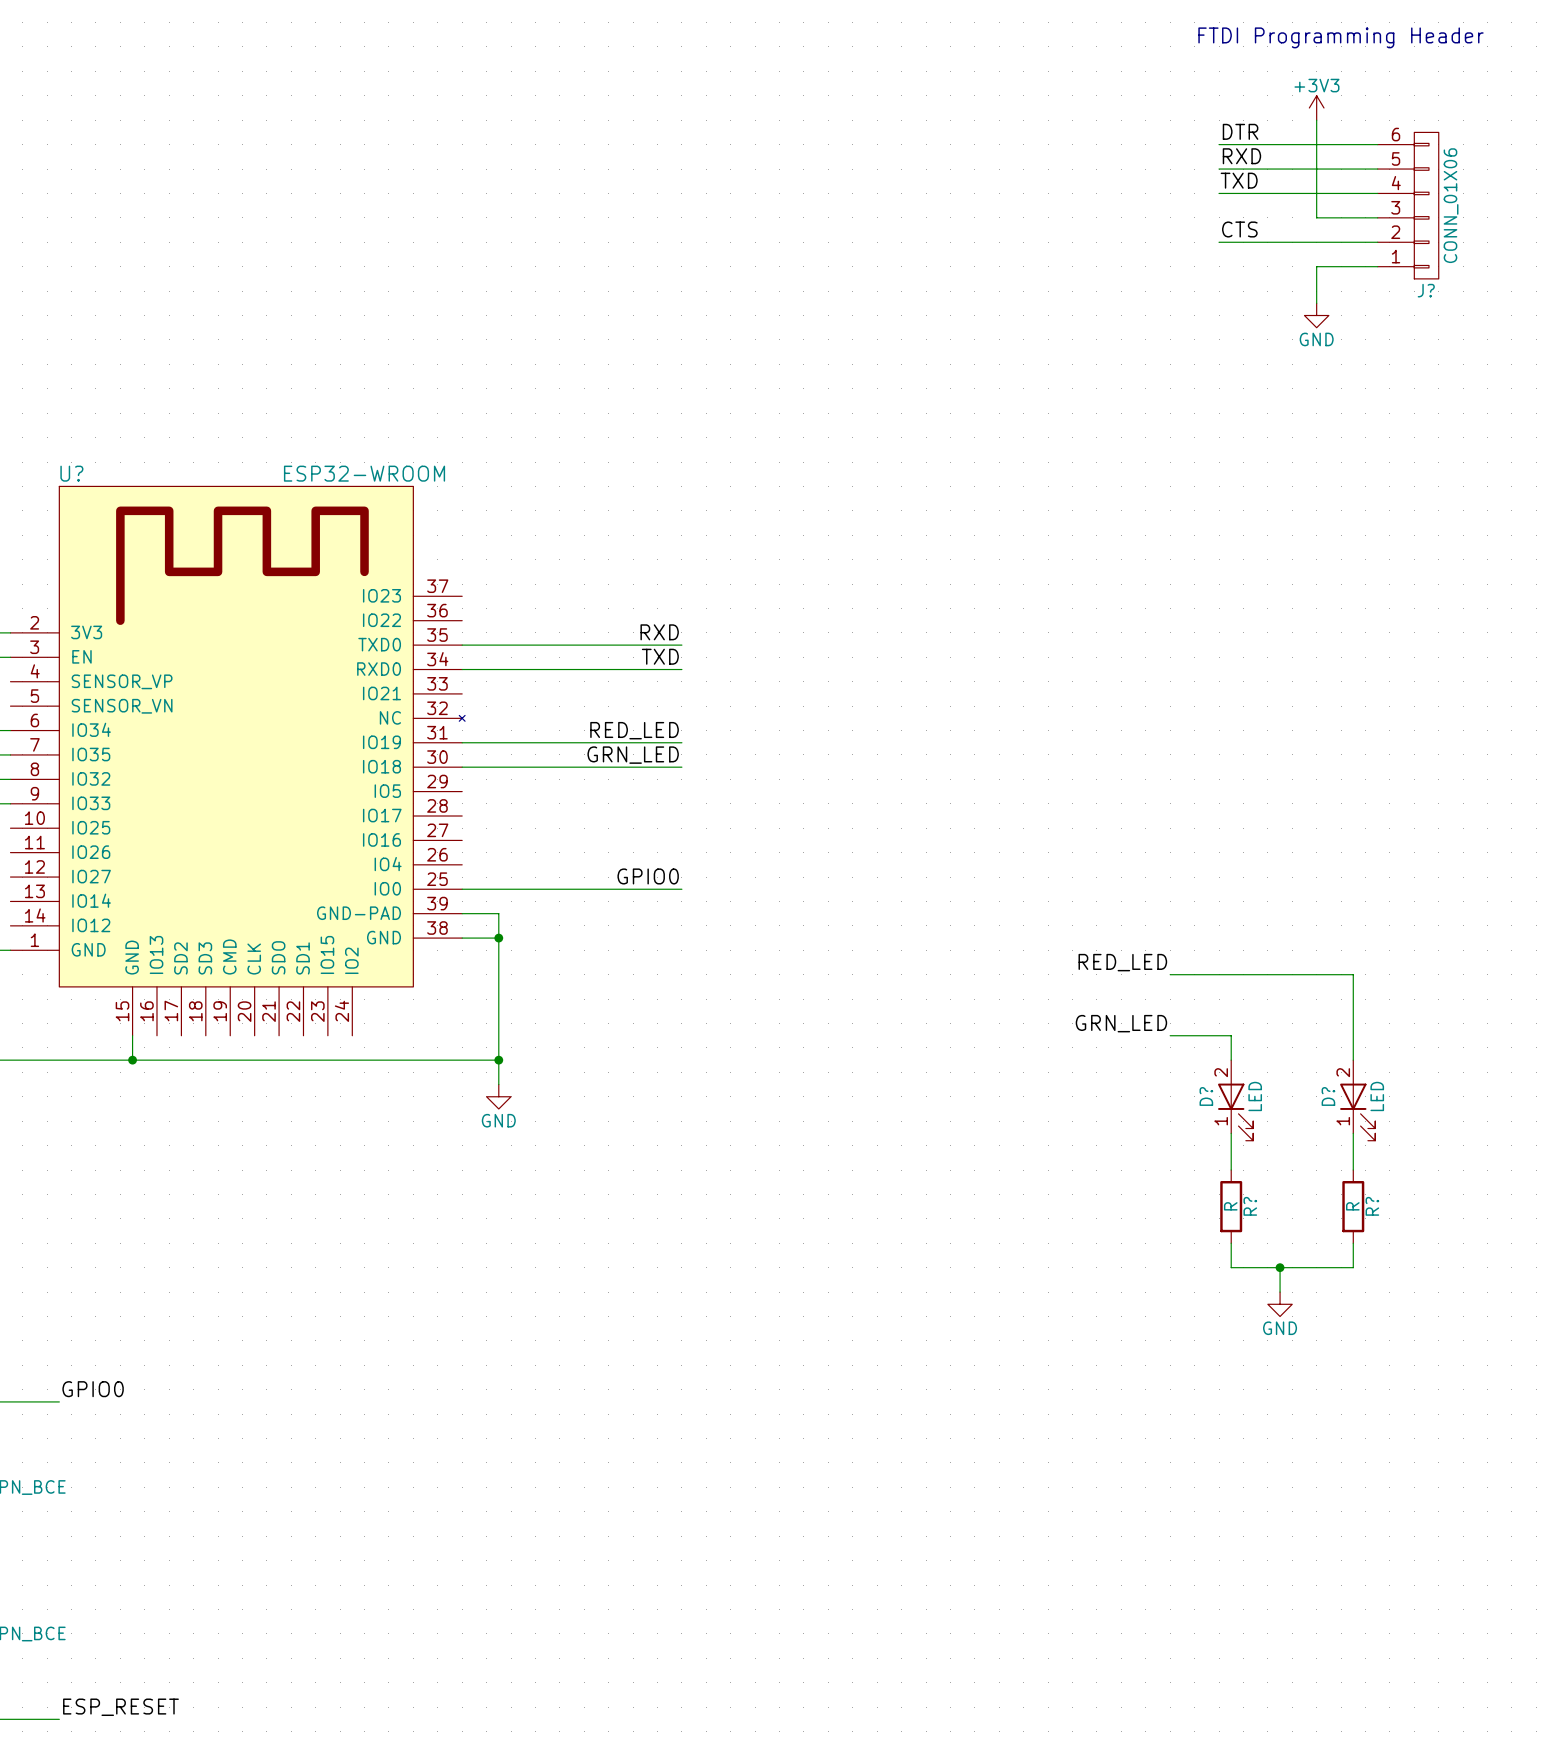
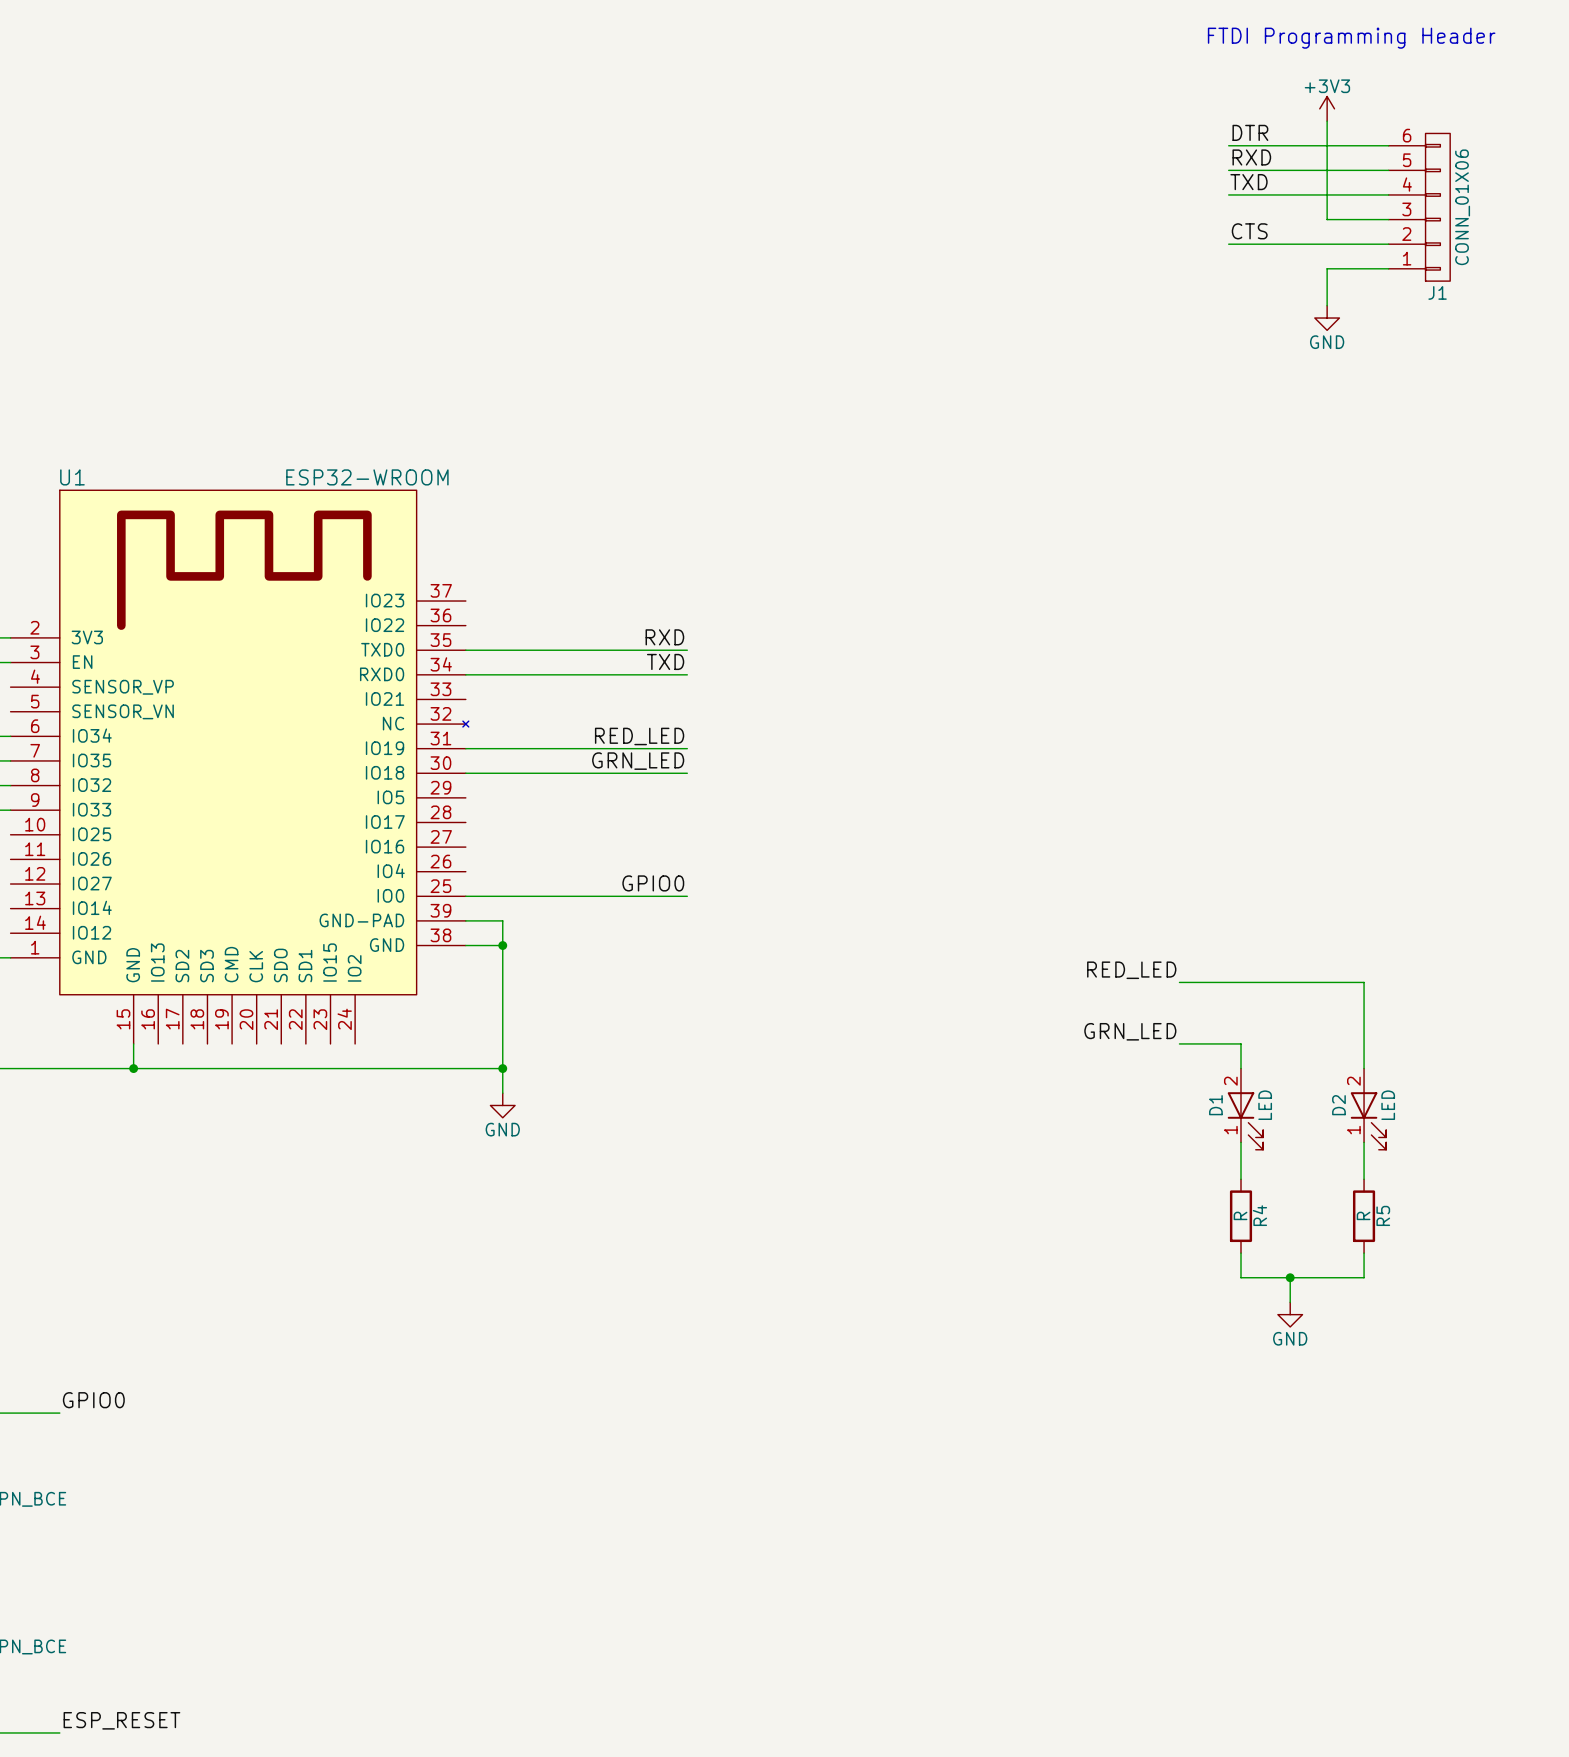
J? name: J? (1426, 290) -> J1 (1437, 292)
U? name: U? (71, 473) -> U1 (72, 477)
D? name: D? (1206, 1096) -> D1 (1215, 1105)
D? name: D? (1328, 1096) -> D2 (1338, 1105)
R? name: R? (1250, 1206) -> R4 (1259, 1215)
R? name: R? (1372, 1206) -> R5 (1383, 1215)

